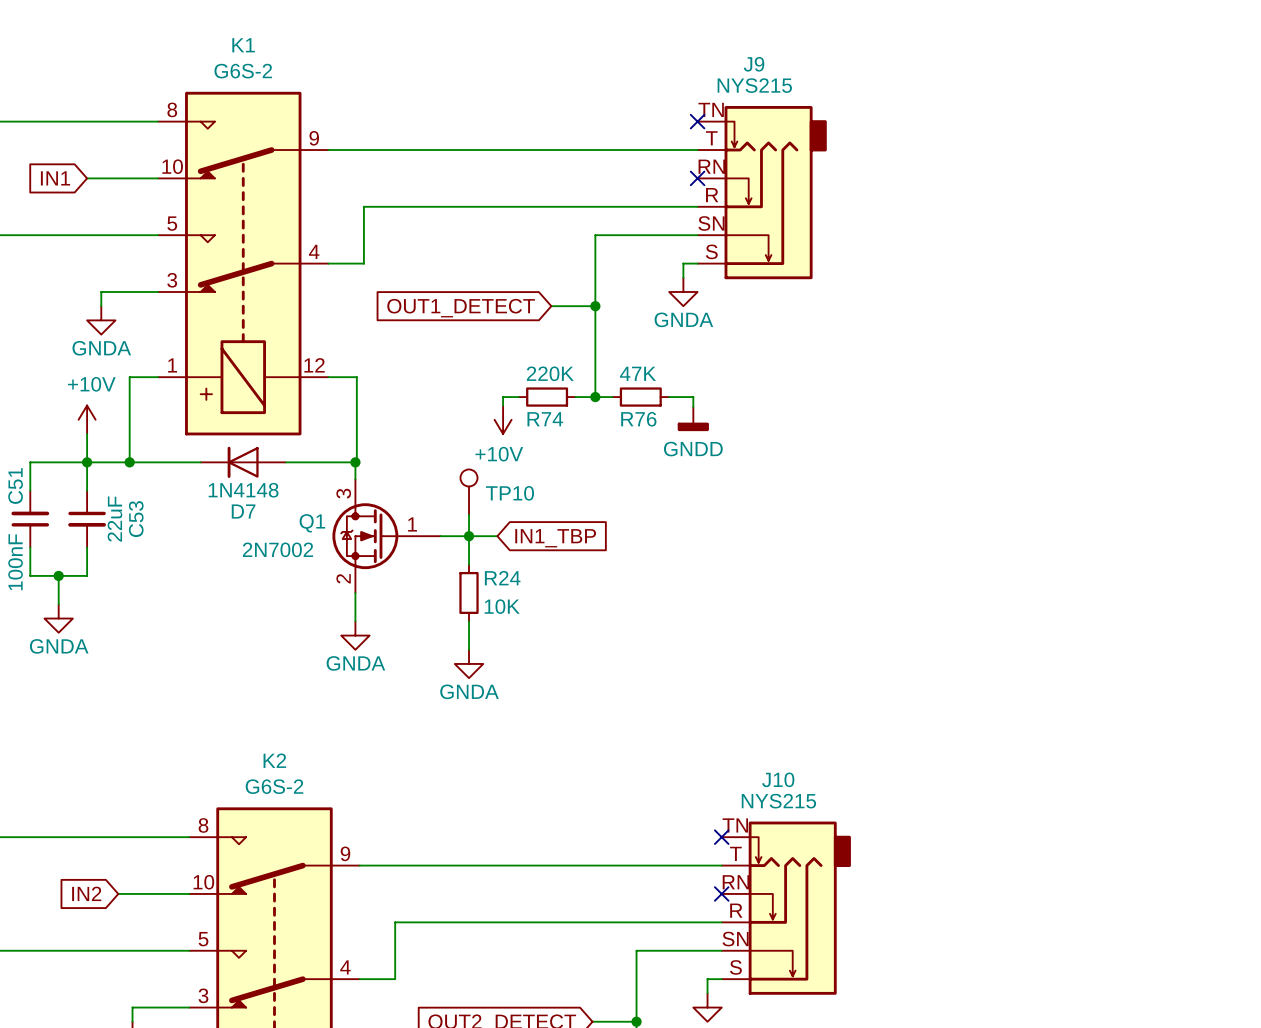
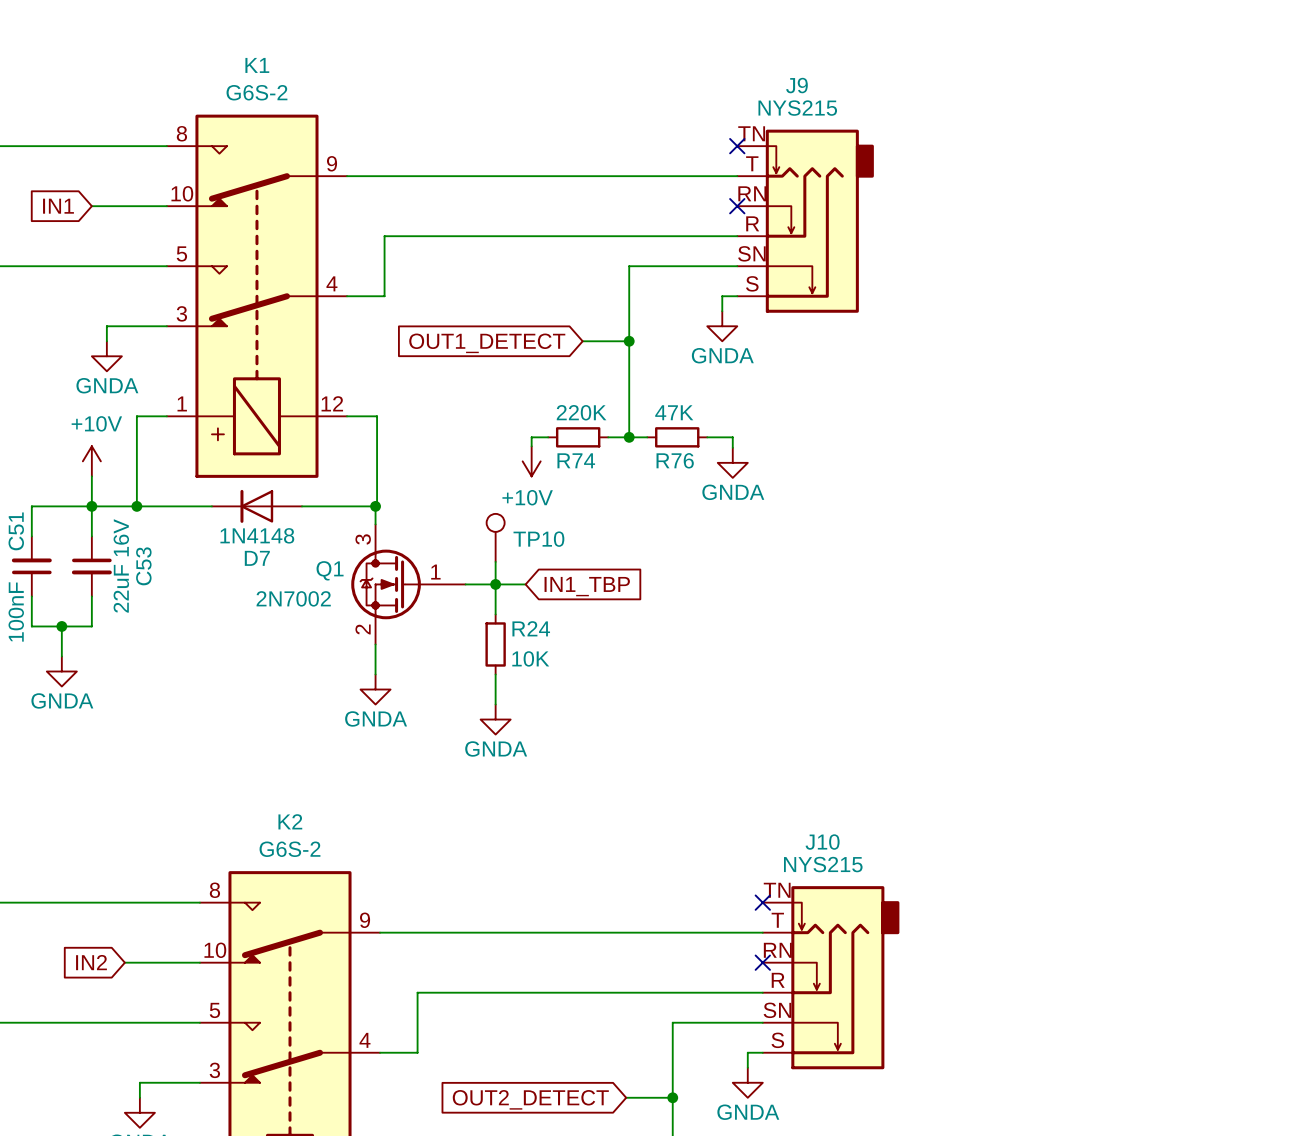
power symbol: GNDD (693, 419) -> GNDA (732, 462)
C53 value: 22uF (114, 519) -> 22uF 16V (121, 565)

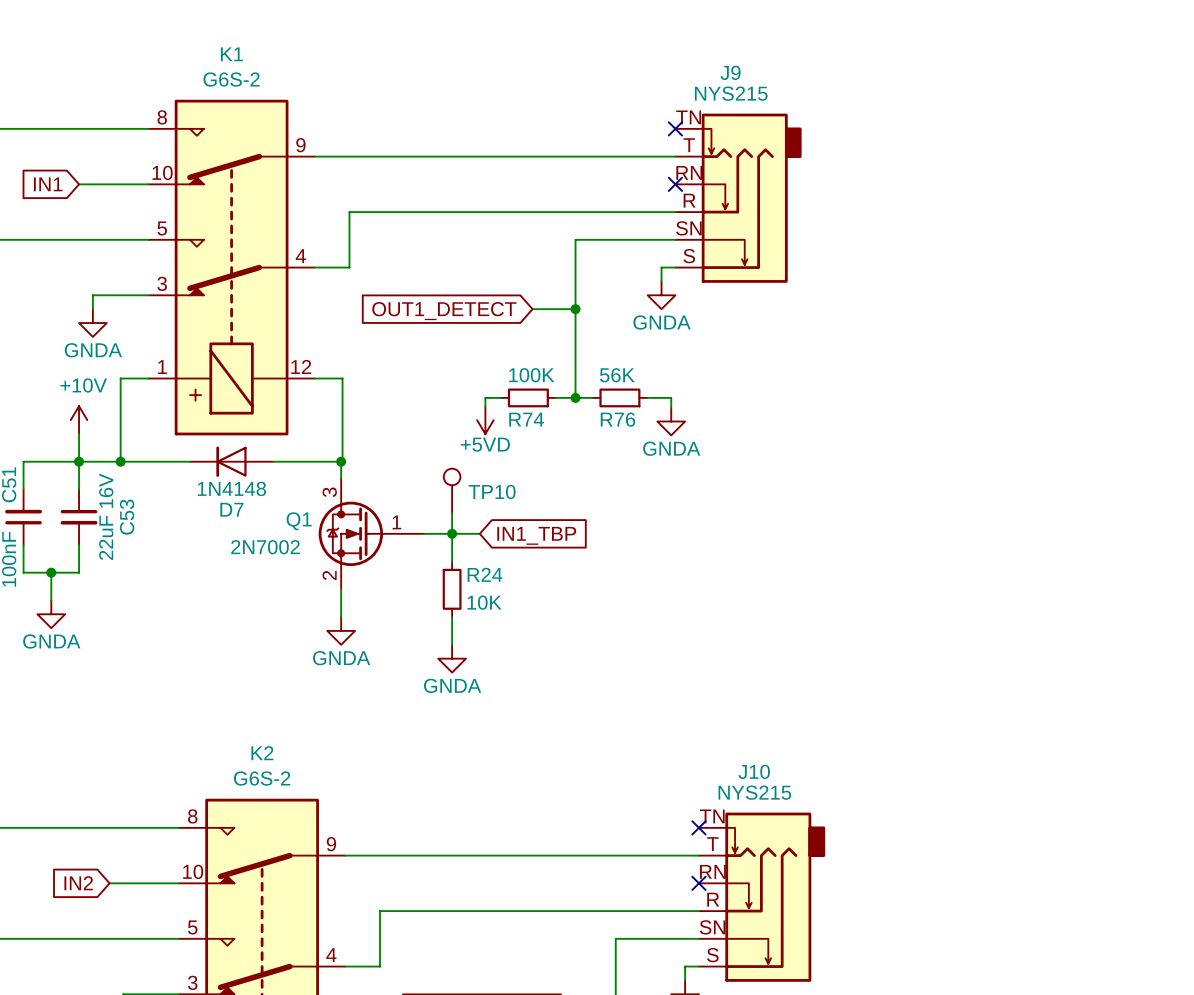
R74 value: 220K (581, 412) -> 100K (531, 375)
R76 value: 47K (674, 412) -> 56K (617, 375)
power symbol: +10V (531, 461) -> +5VD (485, 420)

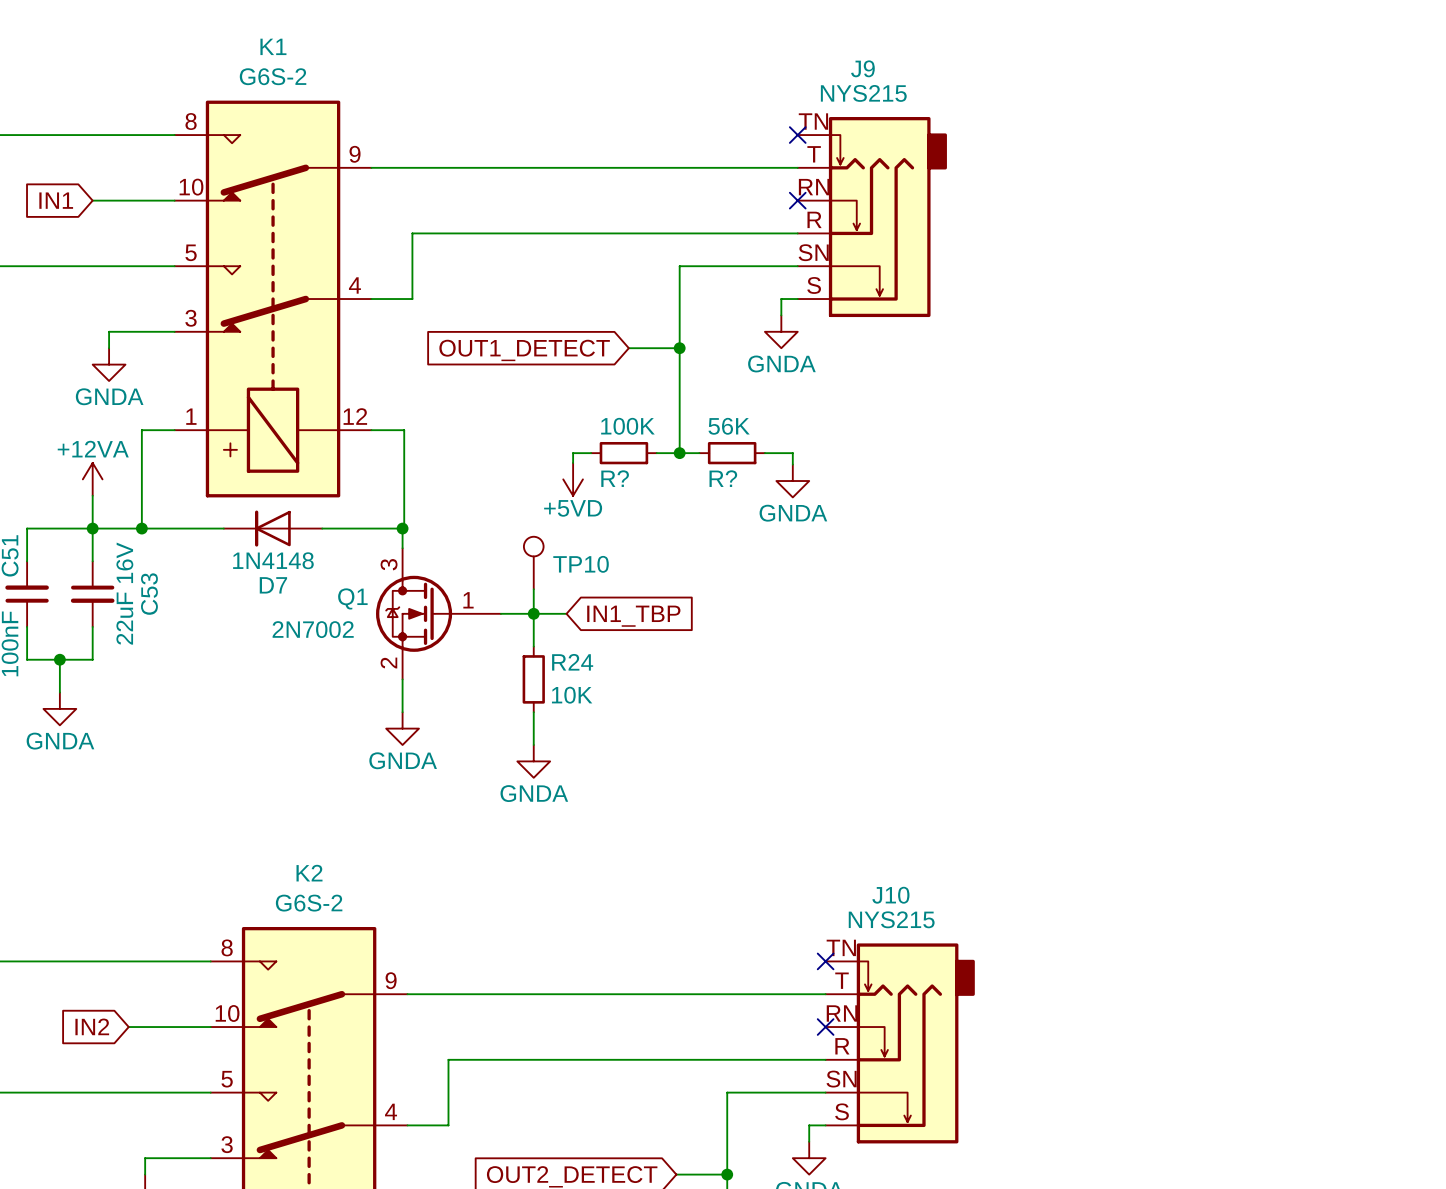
R74 name: R74 (526, 419) -> R? (615, 478)
R76 name: R76 (617, 419) -> R? (723, 478)
power symbol: +10V (79, 420) -> +12VA (92, 479)

